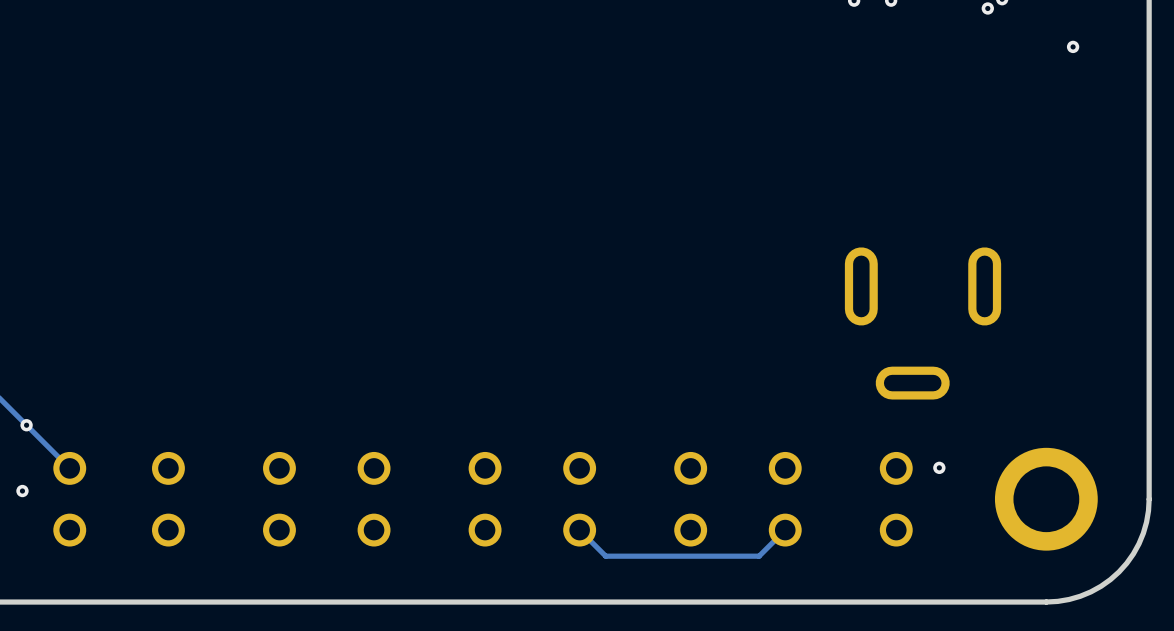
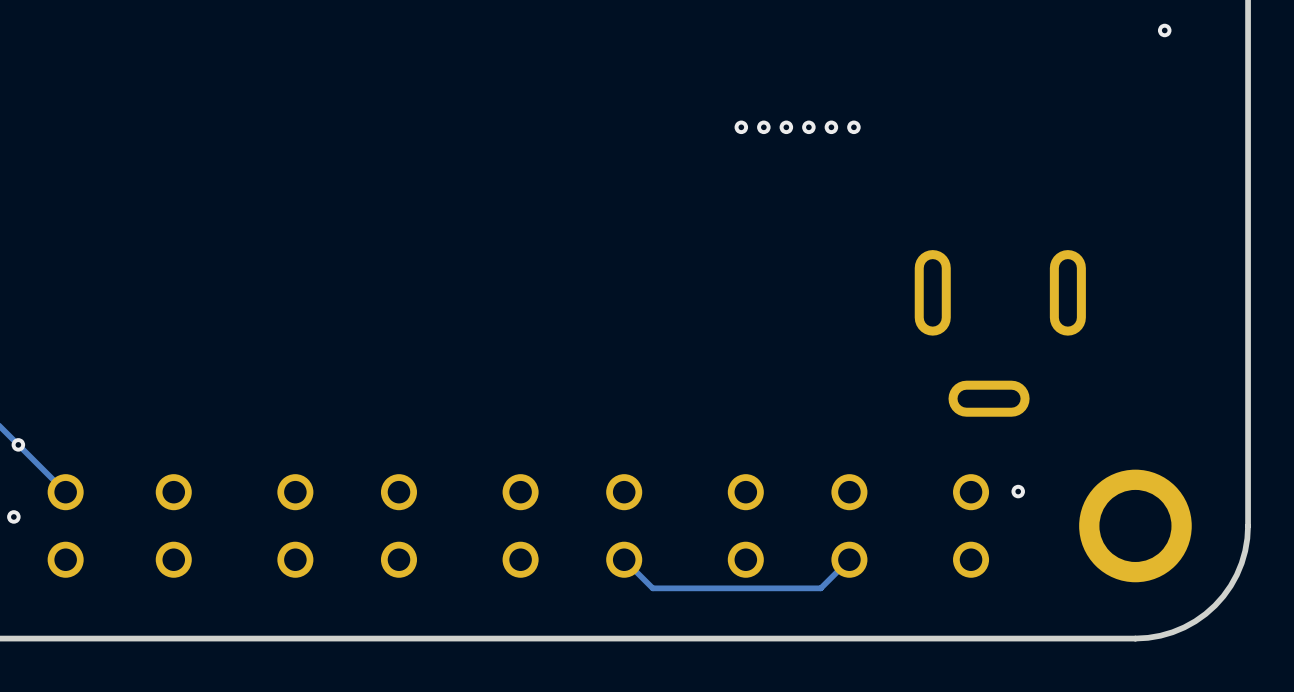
via: none -> (741, 127)
via: none -> (763, 127)
via: none -> (786, 127)
via: none -> (808, 127)
via: none -> (831, 127)
via: none -> (853, 127)

